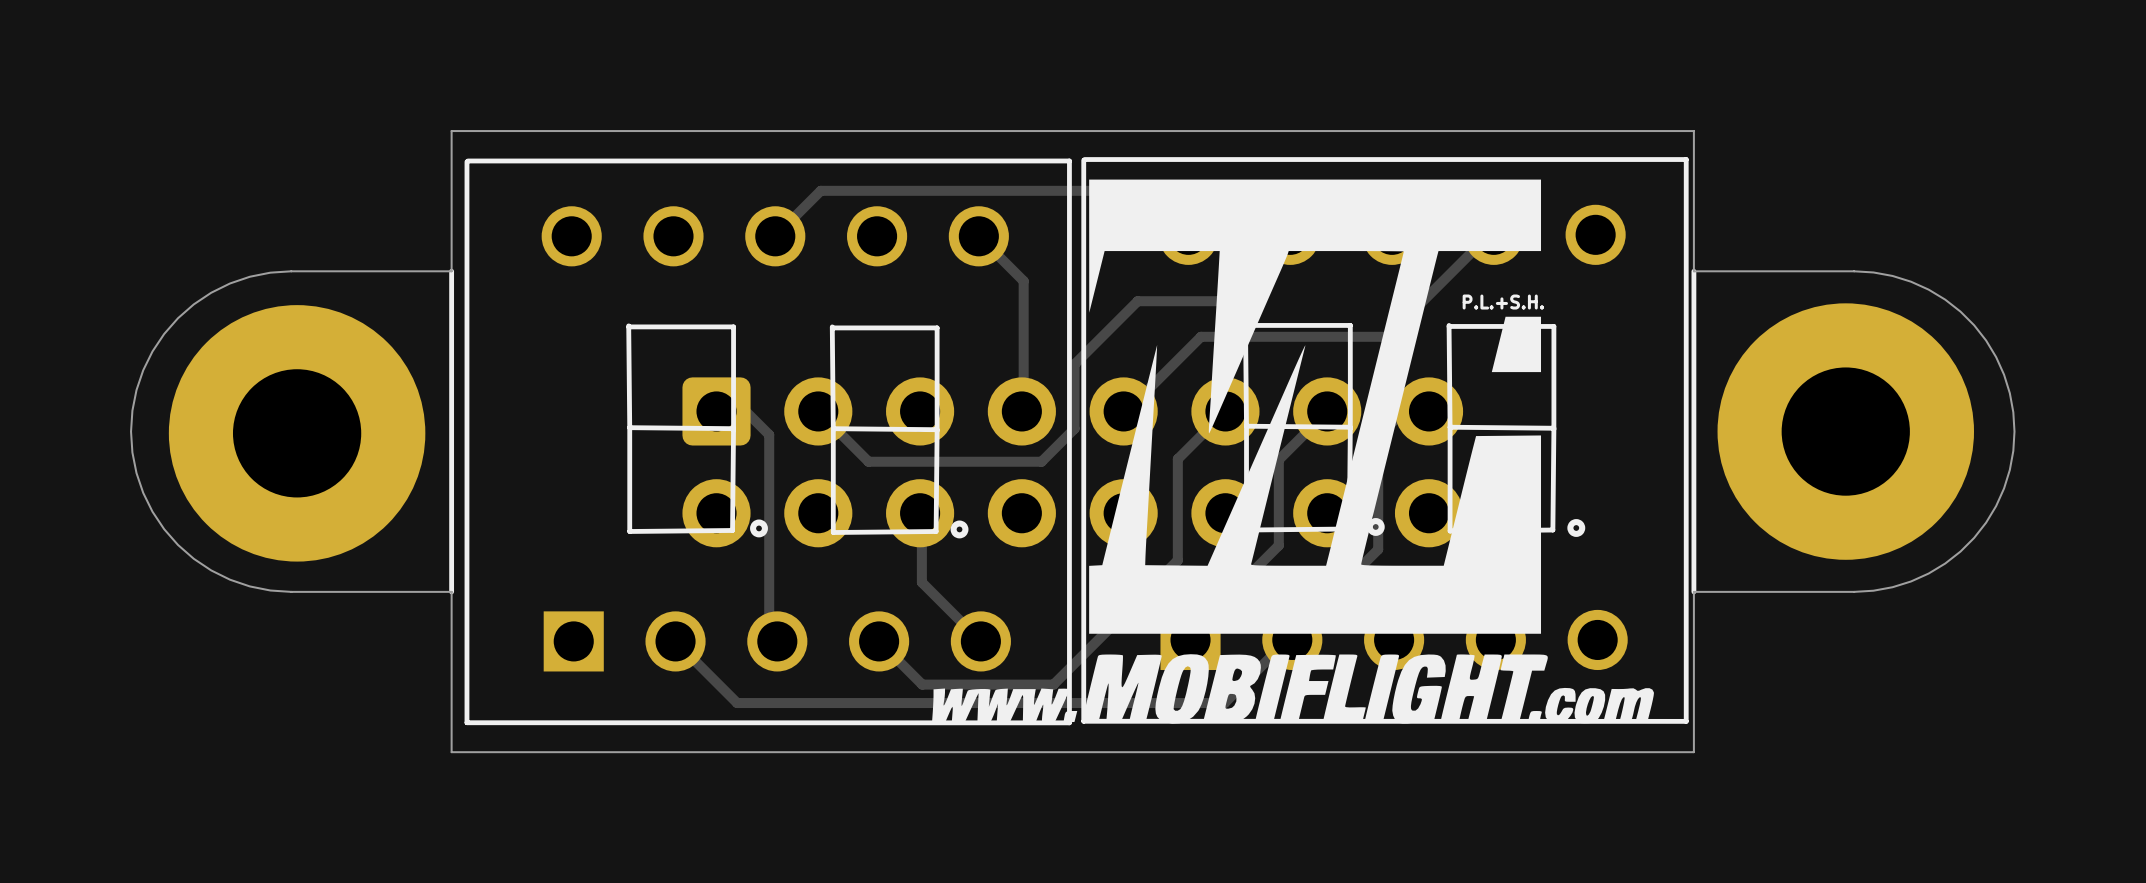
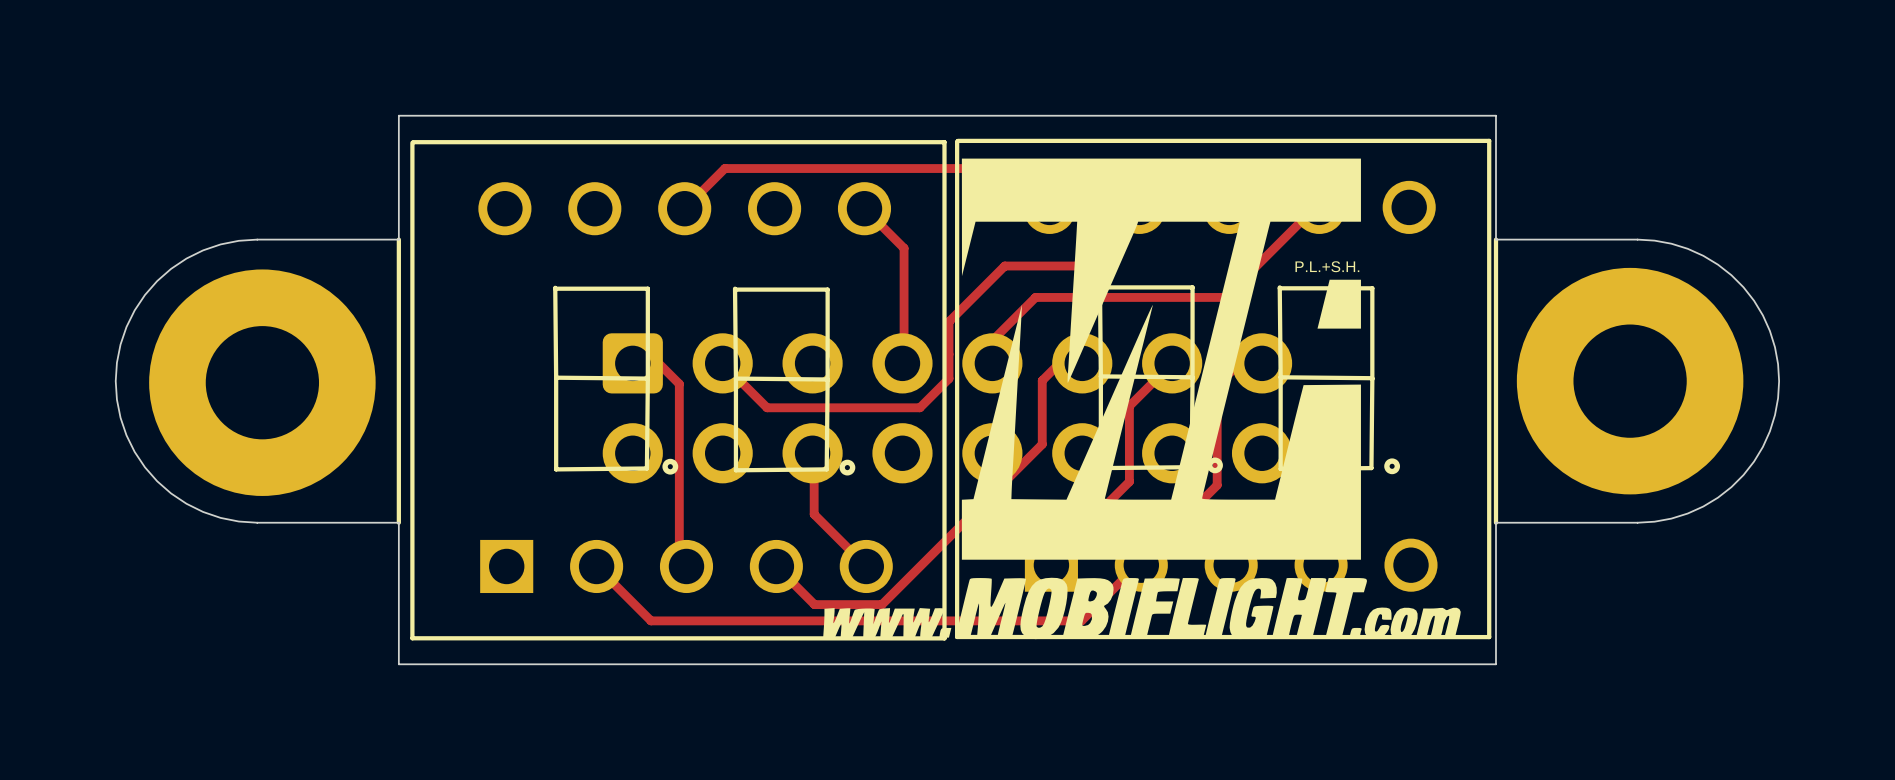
track: (1200, 336) (1126, 411) (1123, 411) -> (1060, 297) (1035, 297) (993, 339)
track: (1227, 409) (1177, 459) (1177, 560) (1053, 684) (998, 684) -> (1083, 339) (1042, 380) (1042, 444) (881, 604)

